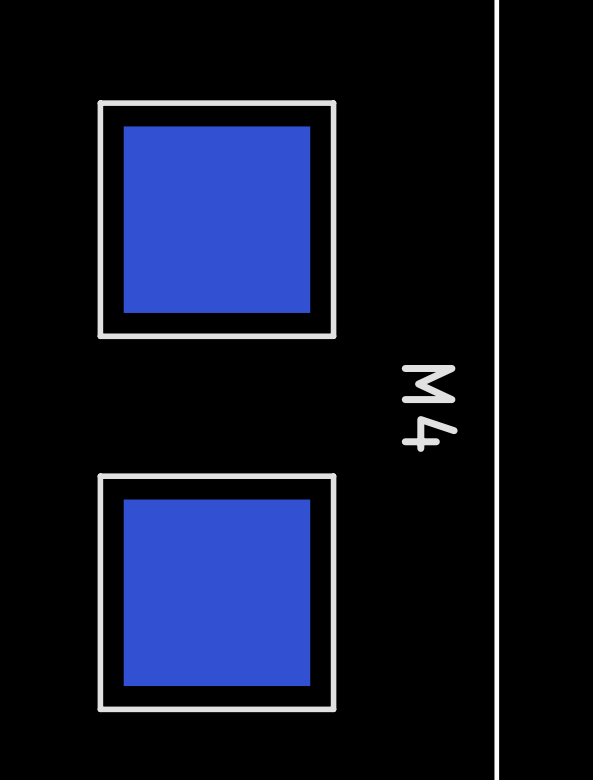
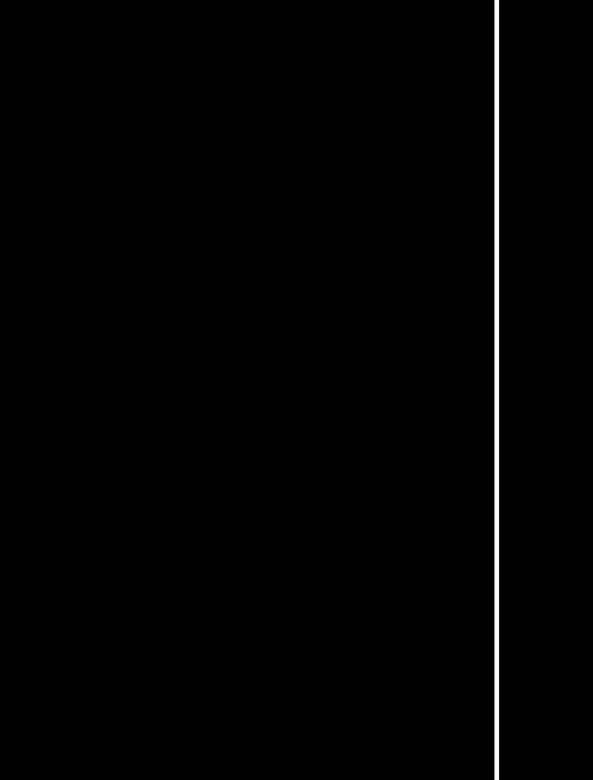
M4: (216, 406) -> none

